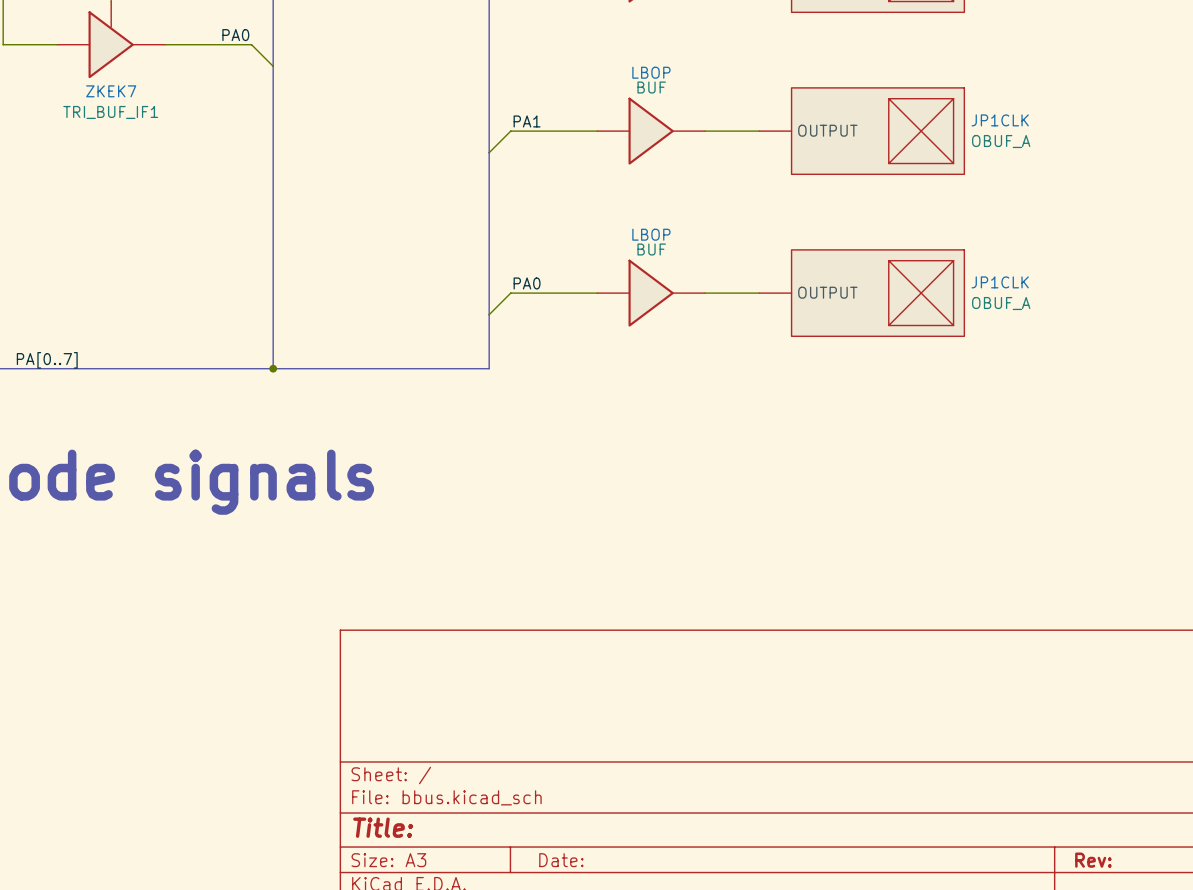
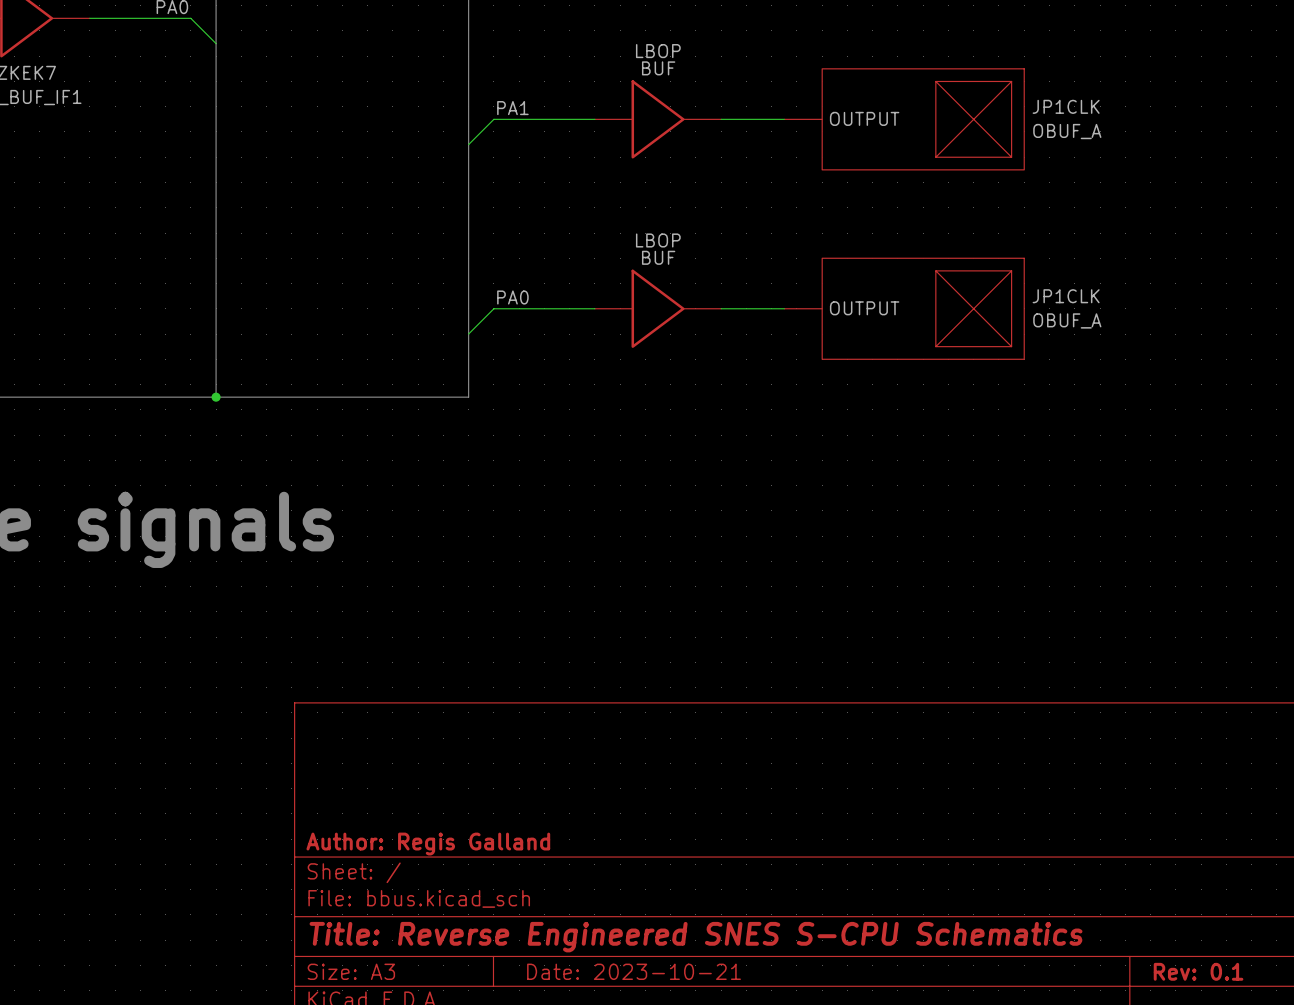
title block: none -> Author: Regis Galland (428, 844)
title block: Title: (383, 827) -> Title: Reverse Engineered SNES S-CPU Schematics (696, 937)
title block: Date: (561, 860) -> Date: 2023-10-21 (634, 971)
title block: Rev: (1093, 860) -> Rev: 0.1 (1198, 971)

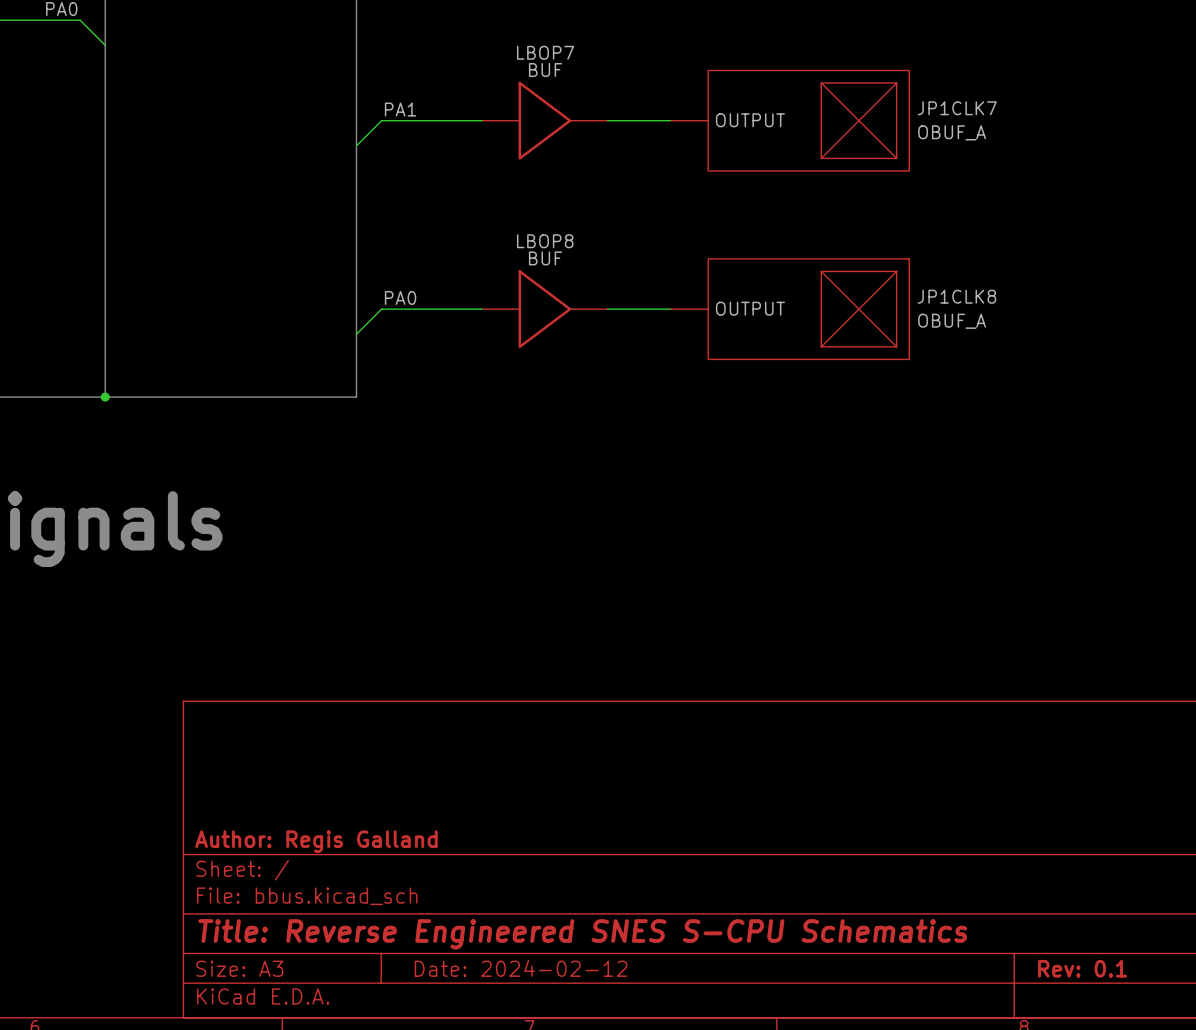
LBOP name: LBOP (658, 51) -> LBOP7 (545, 52)
JP1CLK name: JP1CLK (1066, 106) -> JP1CLK7 (957, 108)
LBOP name: LBOP (658, 240) -> LBOP8 (545, 241)
JP1CLK name: JP1CLK (1066, 296) -> JP1CLK8 (956, 296)
title block: Date: 2023-10-21 (634, 971) -> Date: 2024-02-12 (521, 968)

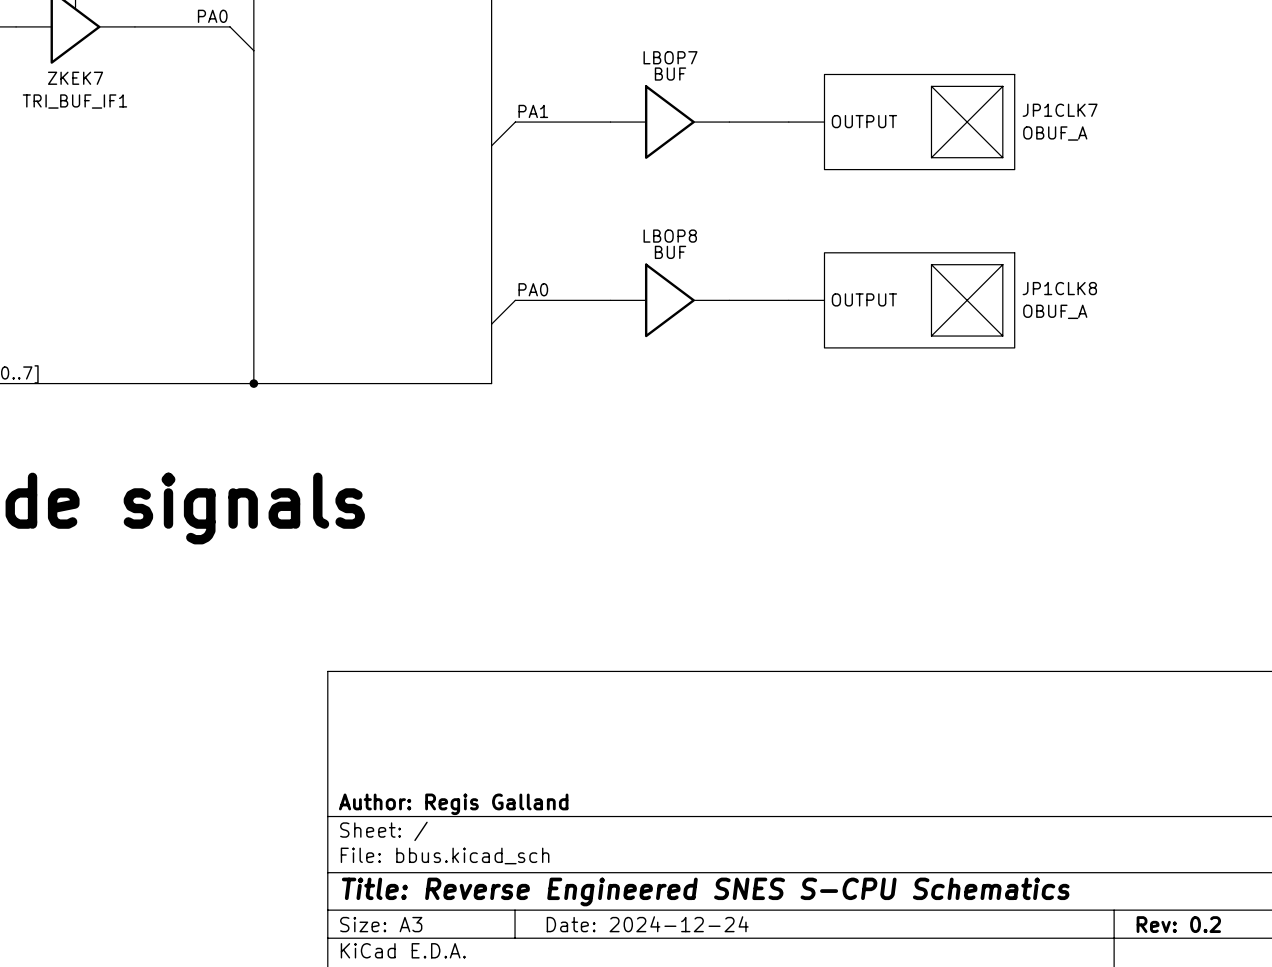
title block: Date: 2024-02-12 (521, 968) -> Date: 2024-12-24 (647, 924)
title block: Rev: 0.1 (1082, 968) -> Rev: 0.2 (1178, 924)

